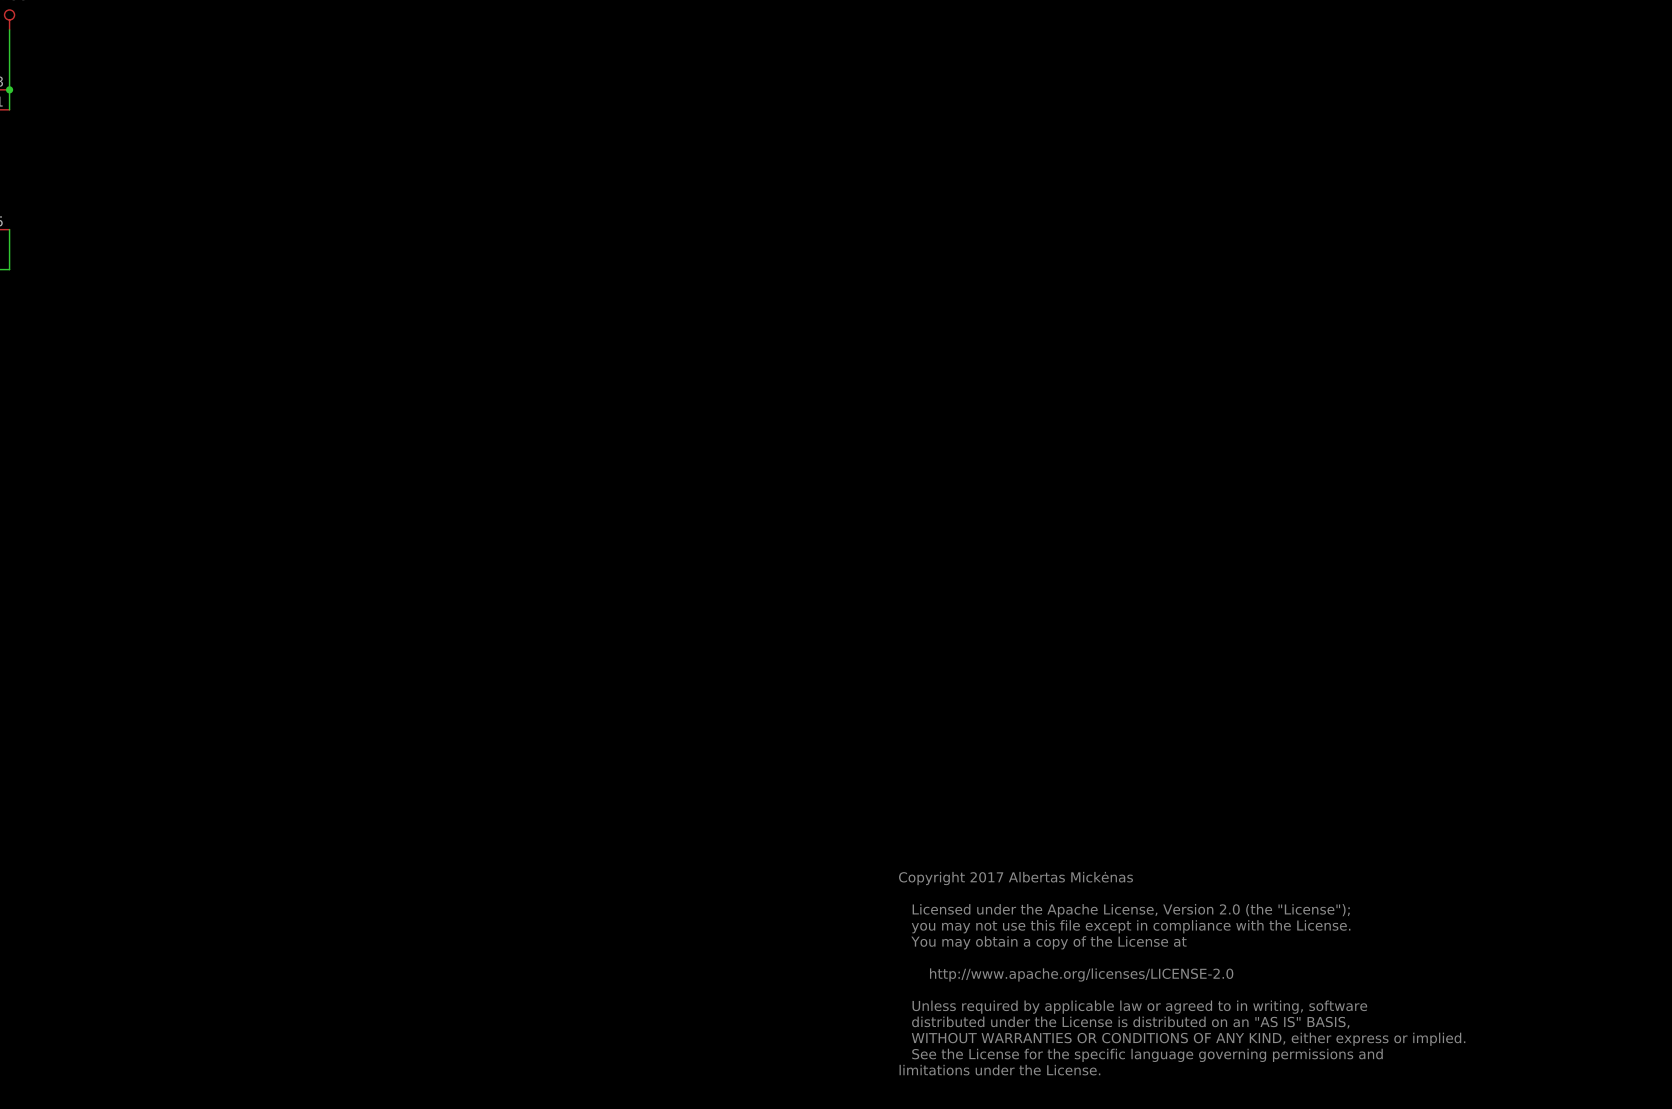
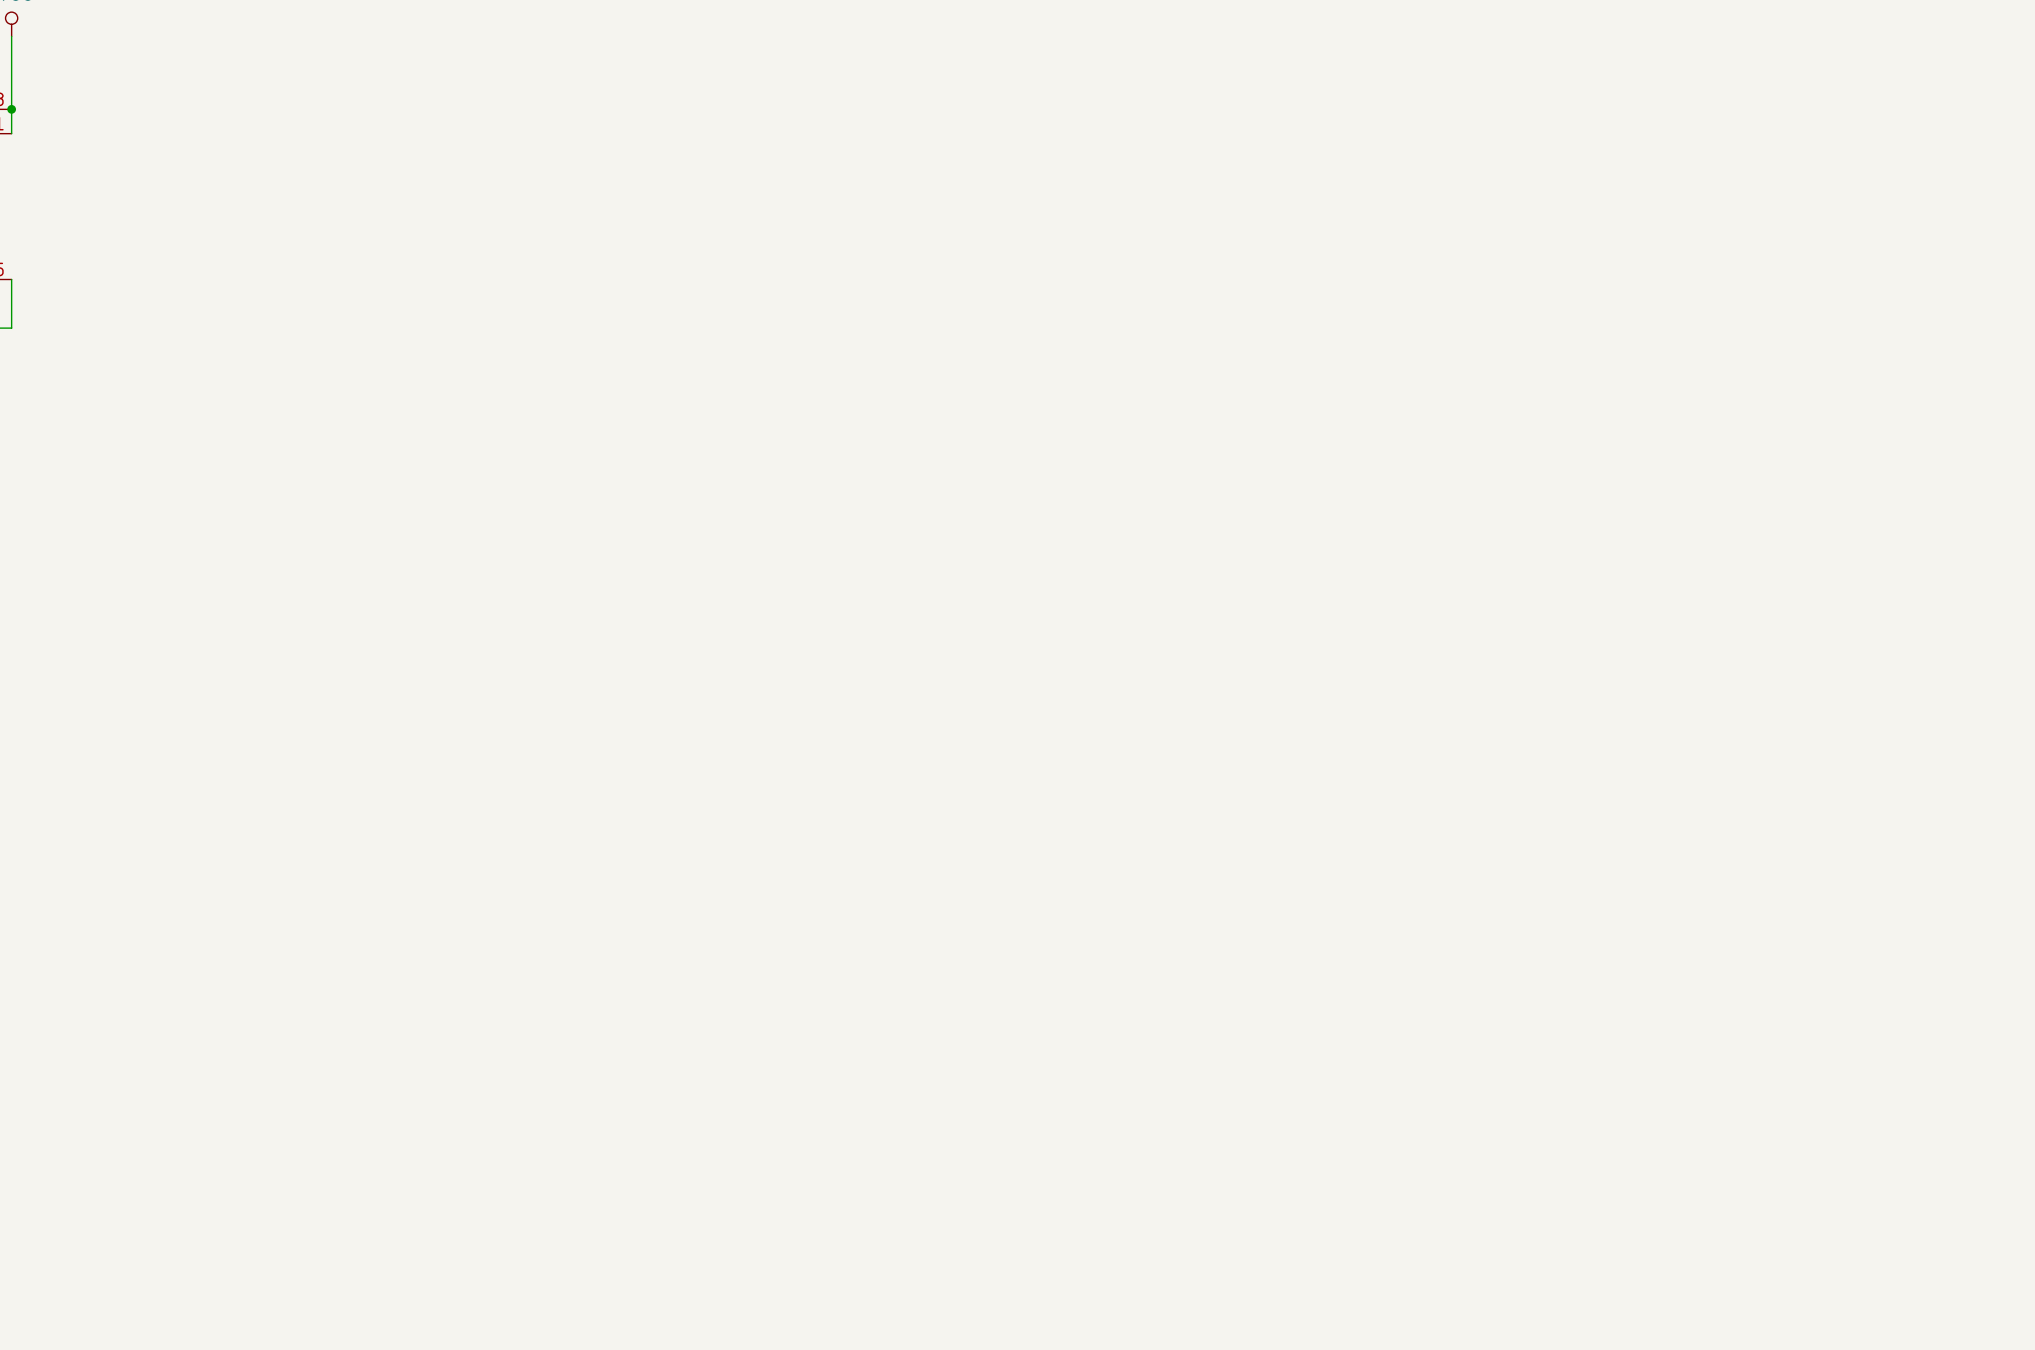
text: Copyright 2017 Albertas Mickėnas (1016, 878) -> none
text: Licensed under the Apache License, Version 2.0 (the "License"); (1131, 910) -> none
text: you may not use this file except in compliance with the License. (1131, 926) -> none
text: You may obtain a copy of the License at (1048, 942) -> none
text: http://www.apache.org/licenses/LICENSE-2.0 (1081, 974) -> none
text: Unless required by applicable law or agreed to in writing, software (1139, 1007) -> none
text: distributed under the License is distributed on an "AS IS" BASIS, (1130, 1022) -> none
text: WITHOUT WARRANTIES OR CONDITIONS OF ANY KIND, either express or implied. (1188, 1039) -> none
text: See the License for the specific language governing permissions and (1147, 1055) -> none
text: limitations under the License. (999, 1070) -> none

